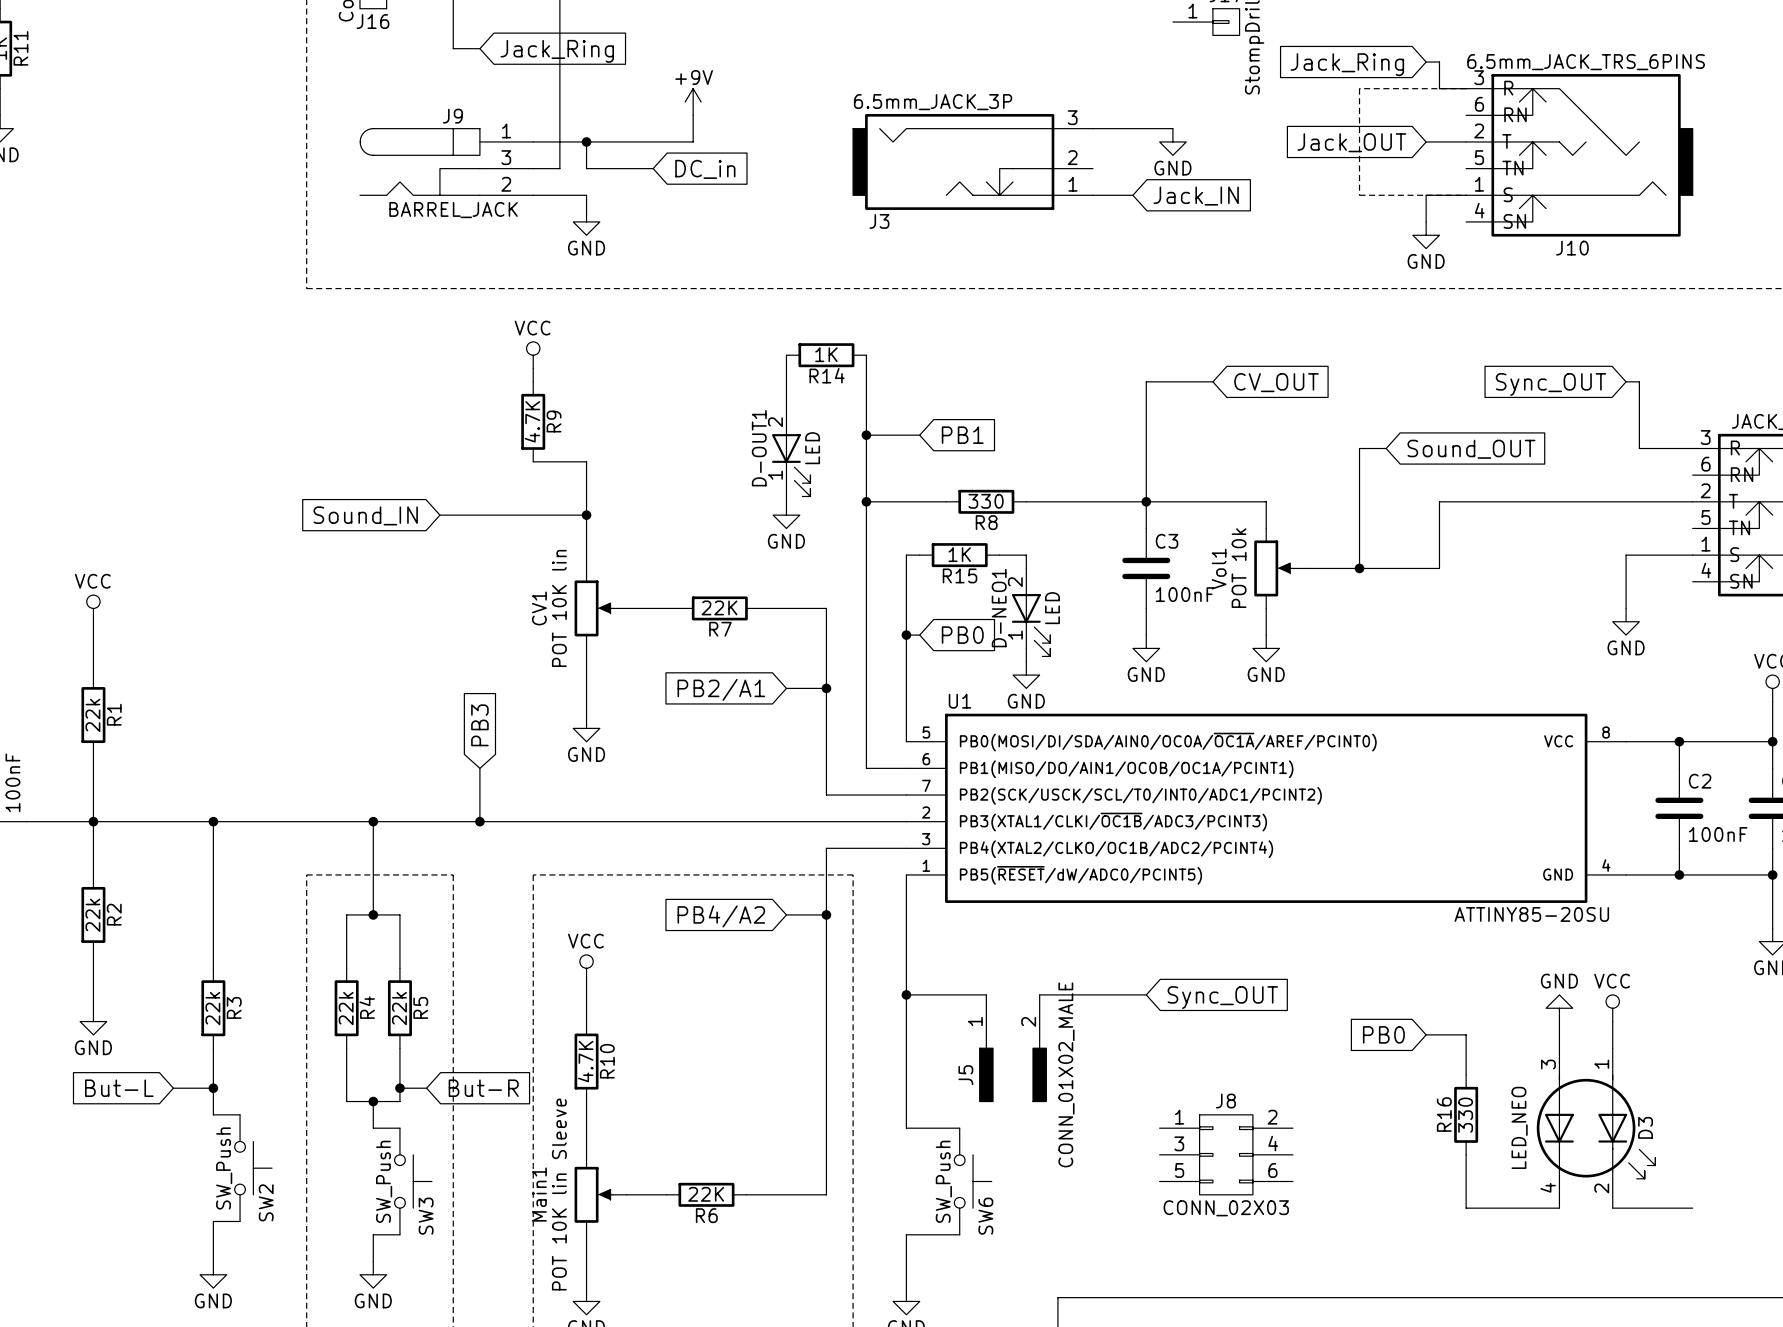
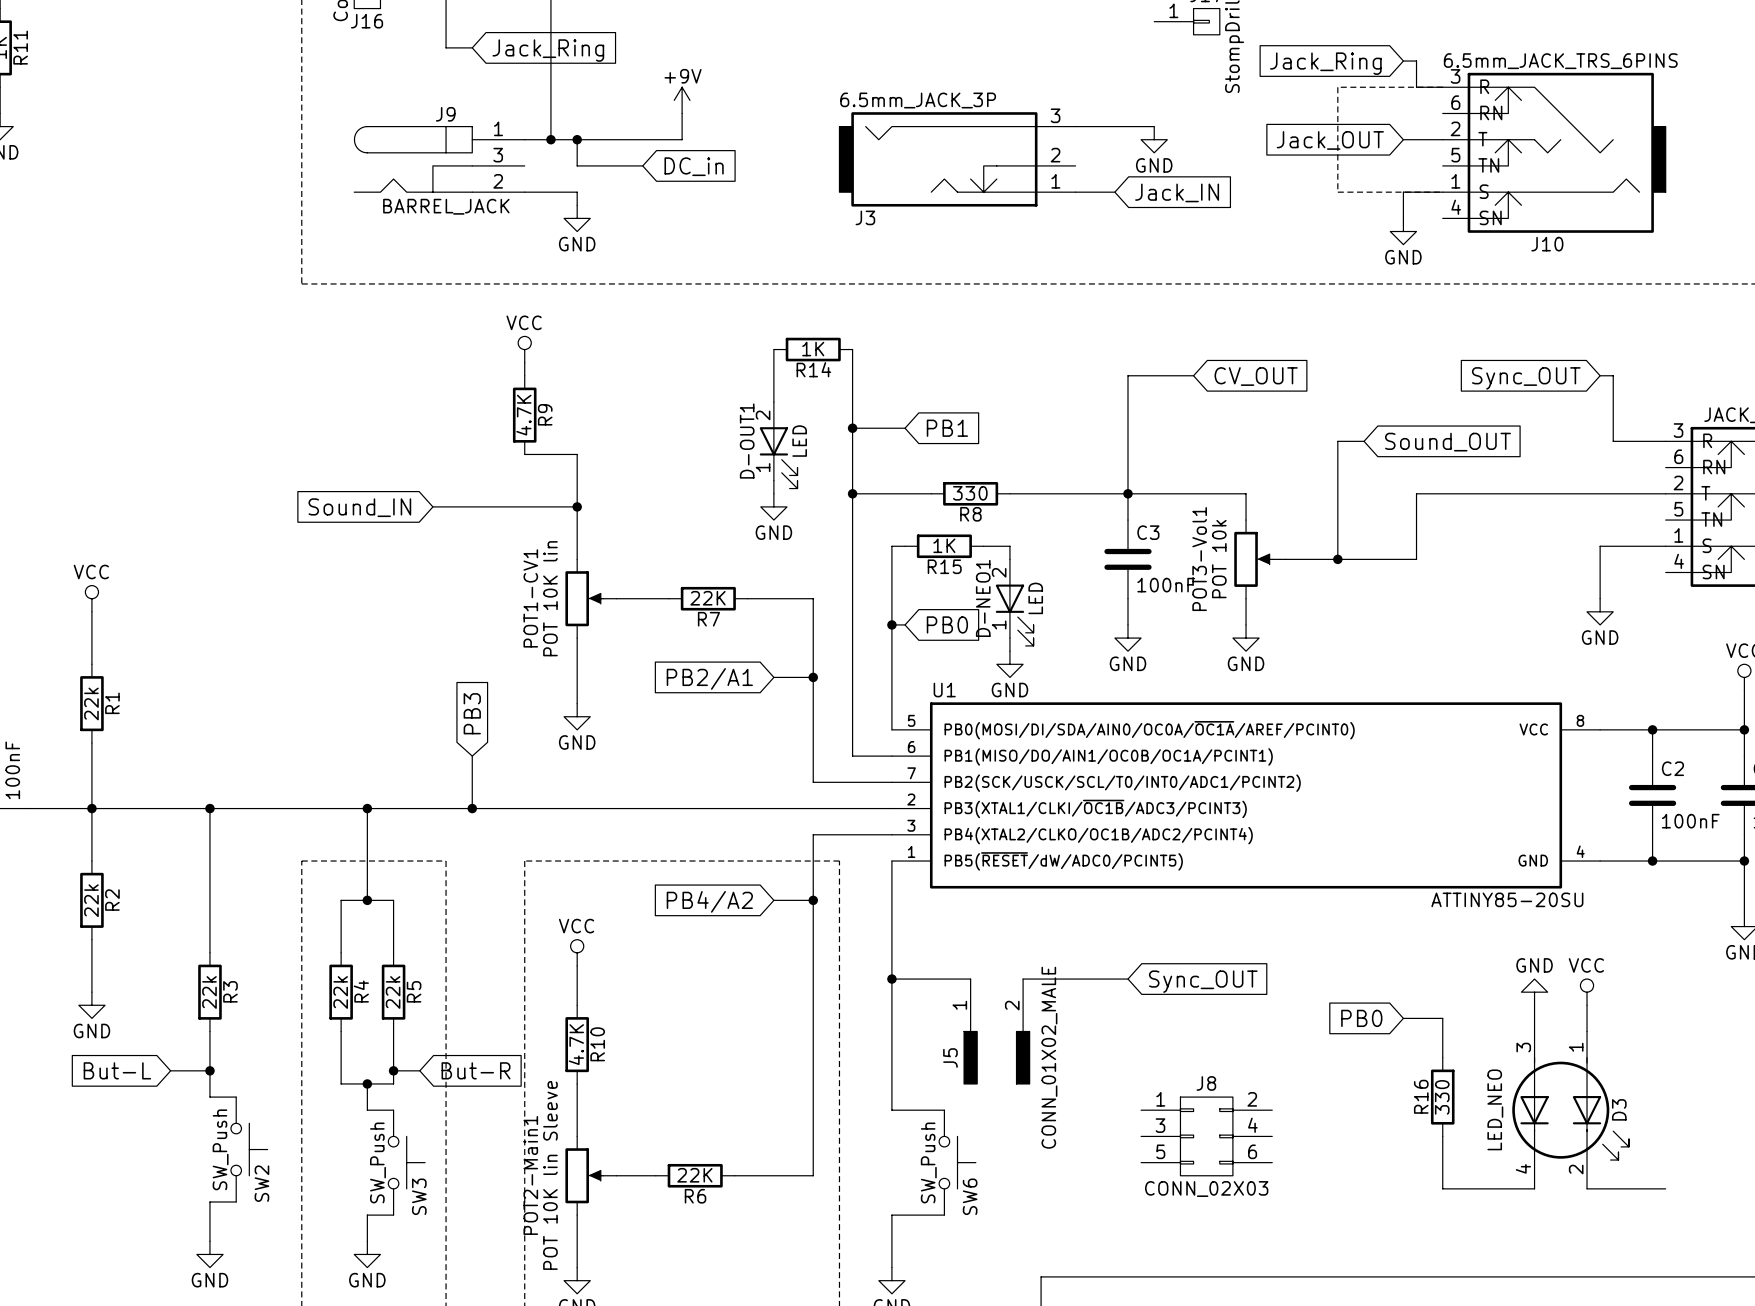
wire: (559, 141) (559, 168) (533, 168) -> none
junction: none -> (550, 139)
Vol1 name: Vol1 (1219, 569) -> POT3-Vol1 (1199, 559)
CV1 name: CV1 (539, 608) -> POT1-CV1 (530, 598)
Main1 name: Main1 (539, 1194) -> POT2-Main1 (530, 1175)

